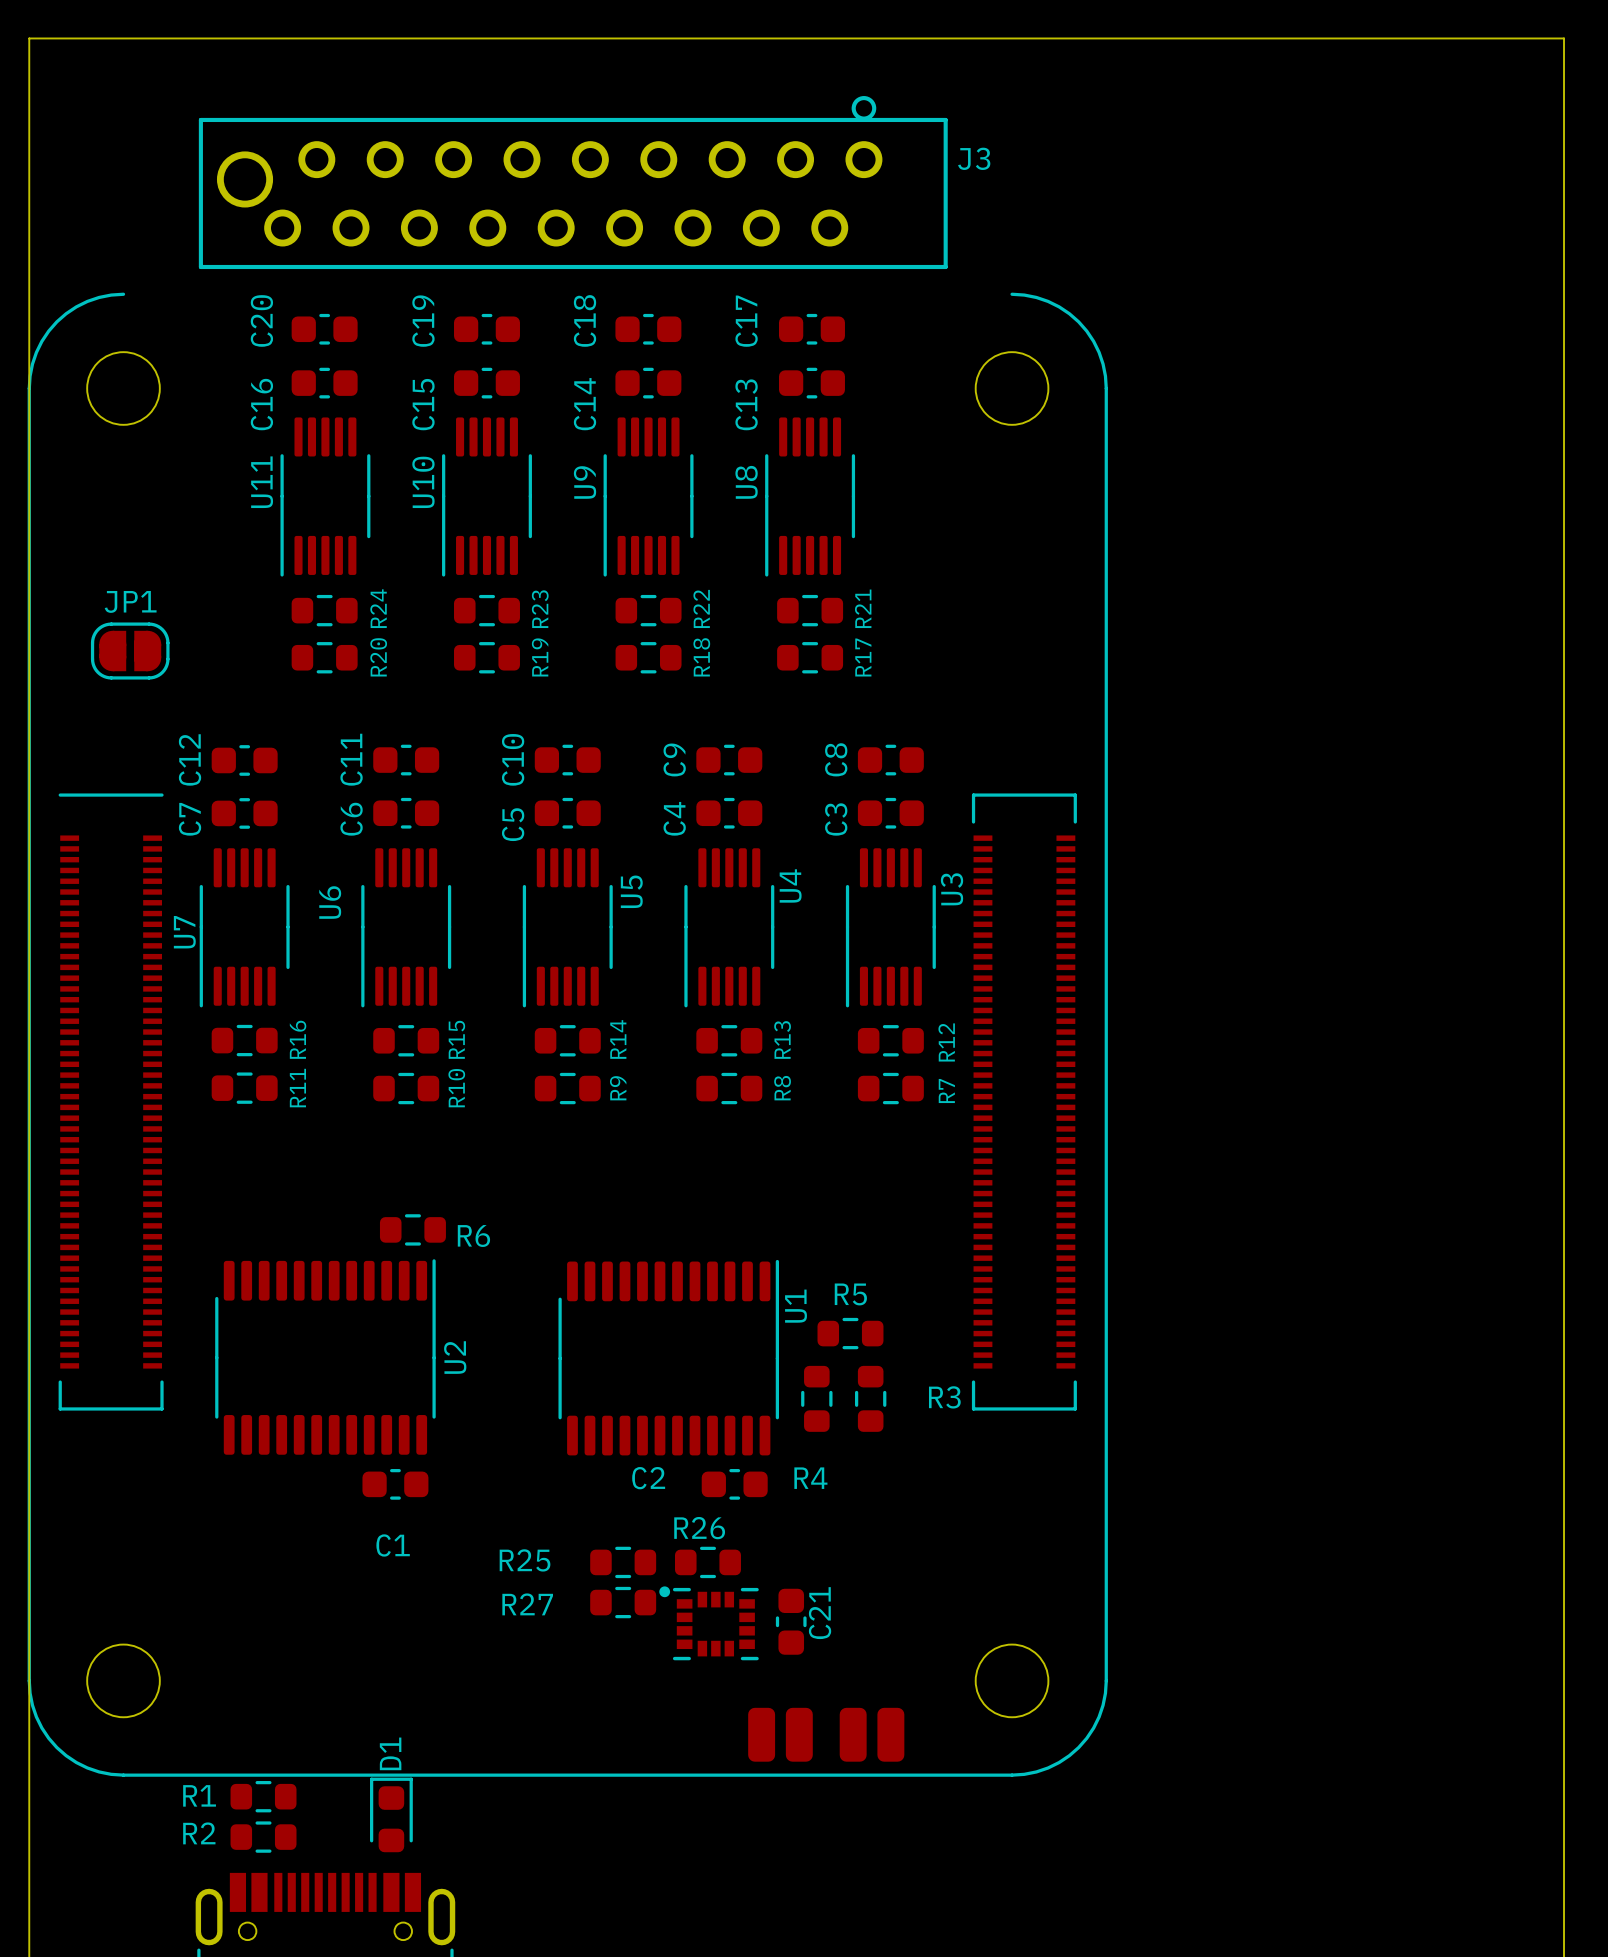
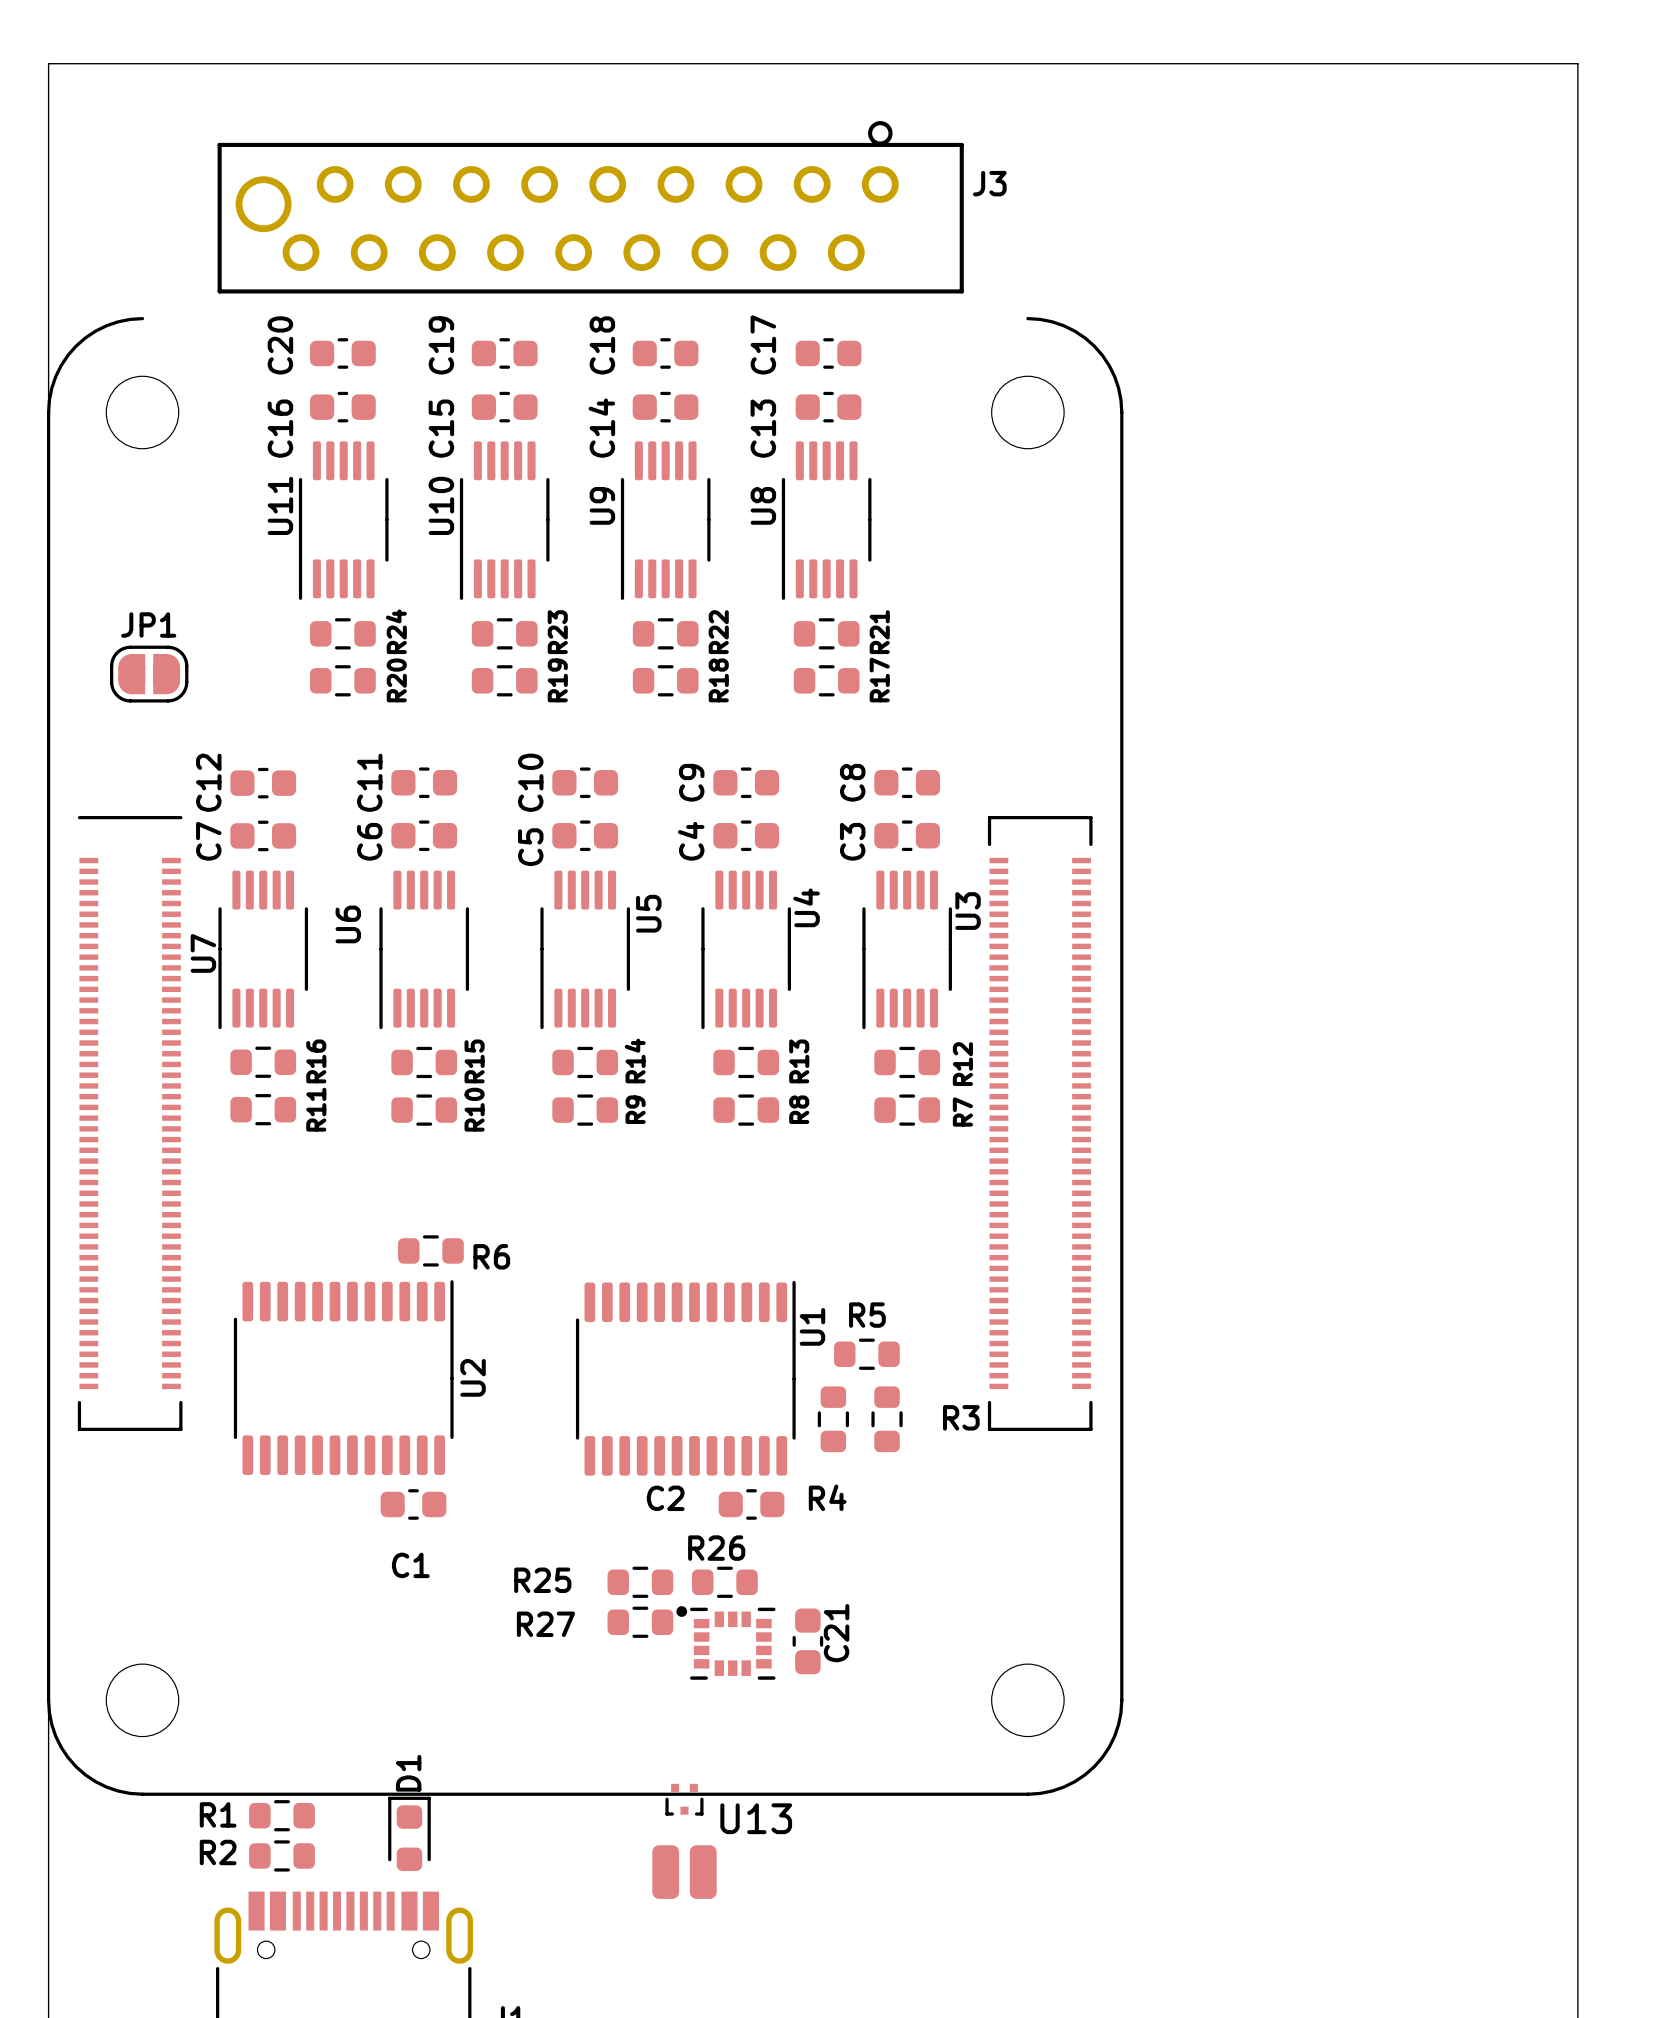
part: (761, 1734) -> none
part: (799, 1734) -> none
part: (853, 1734) -> none
part: (890, 1734) -> none
U13: none -> (684, 1799)
part: none -> (665, 1872)
part: none -> (703, 1872)

